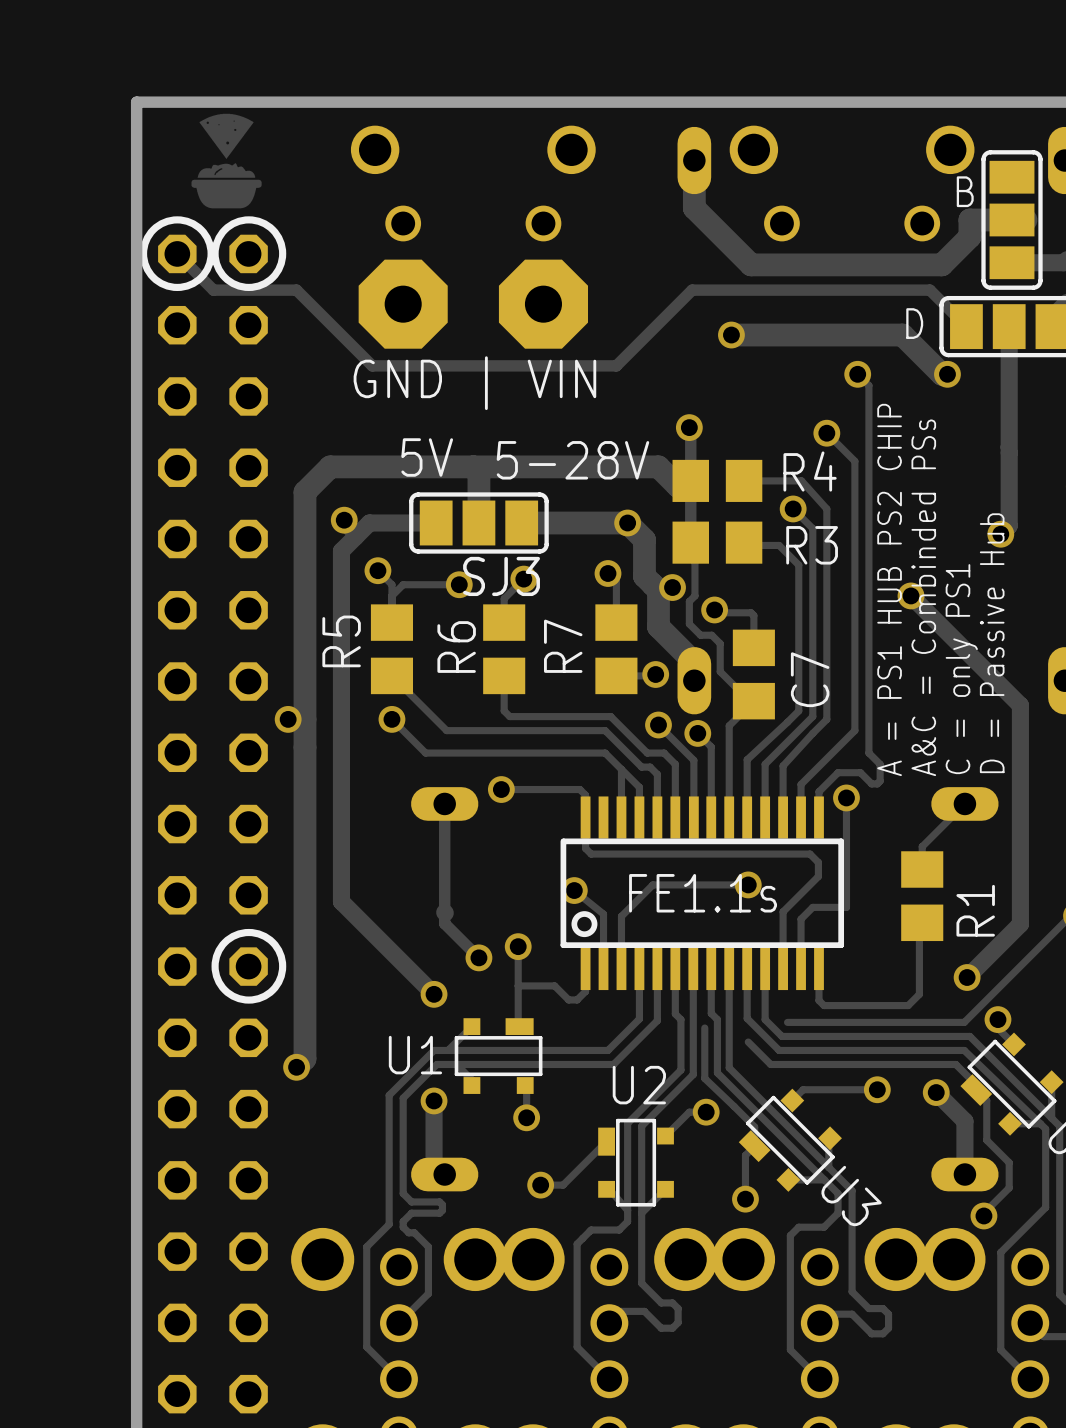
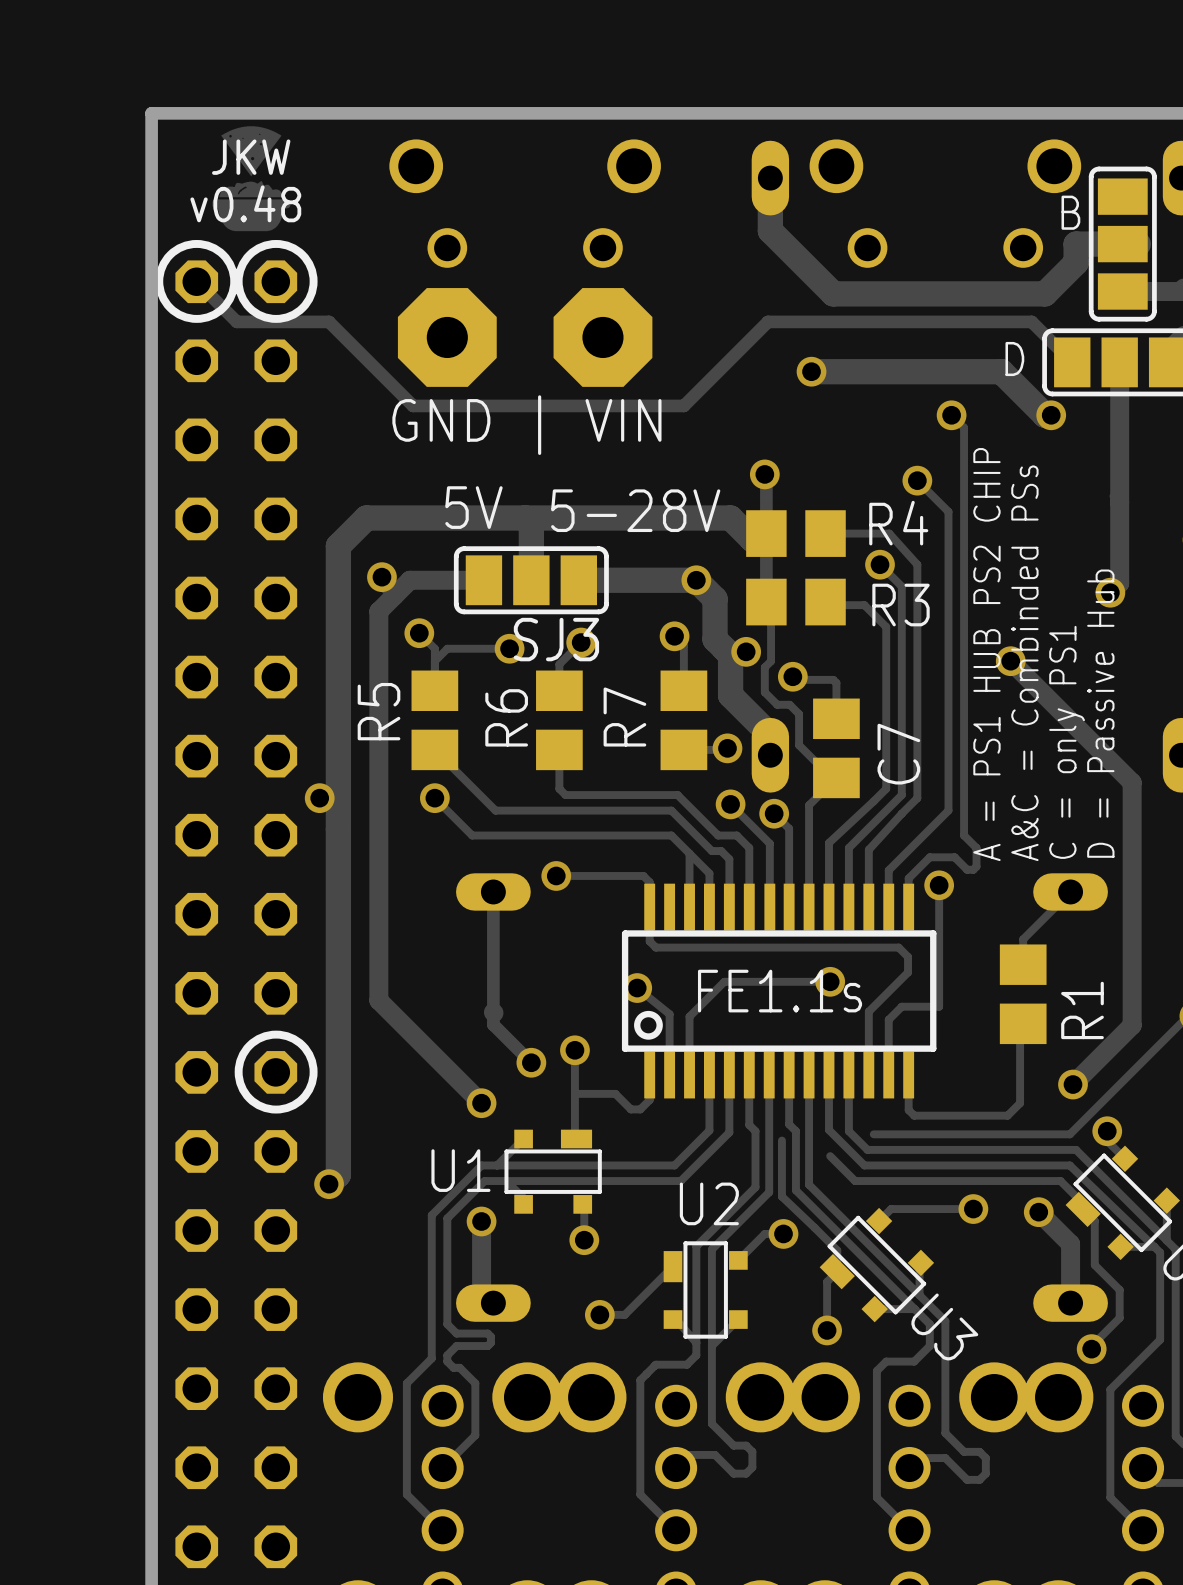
text: none -> JKW (251, 157)
text: none -> v0.48 (245, 203)

